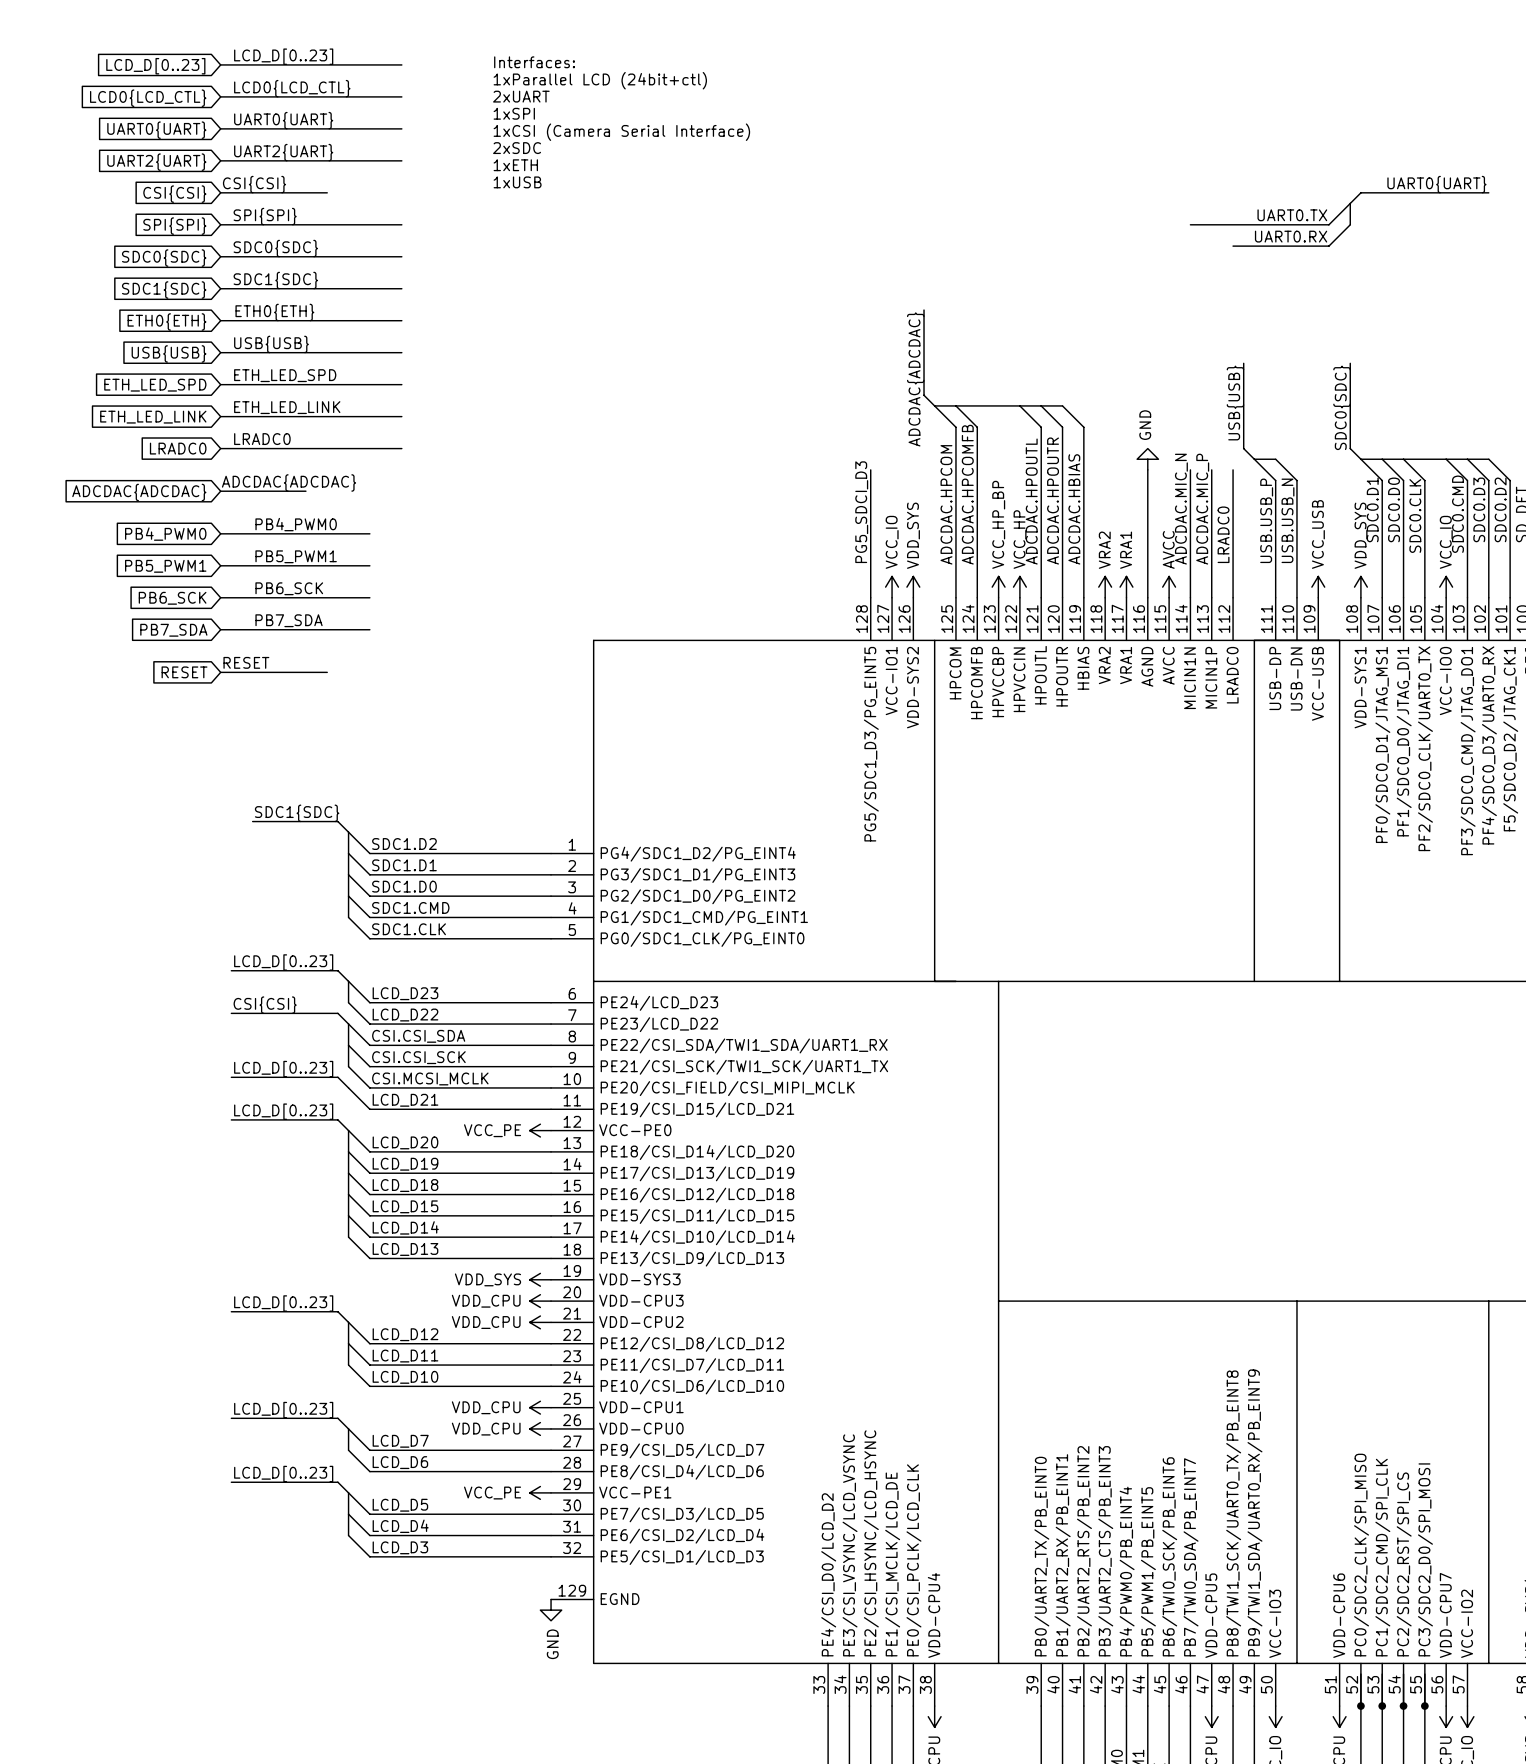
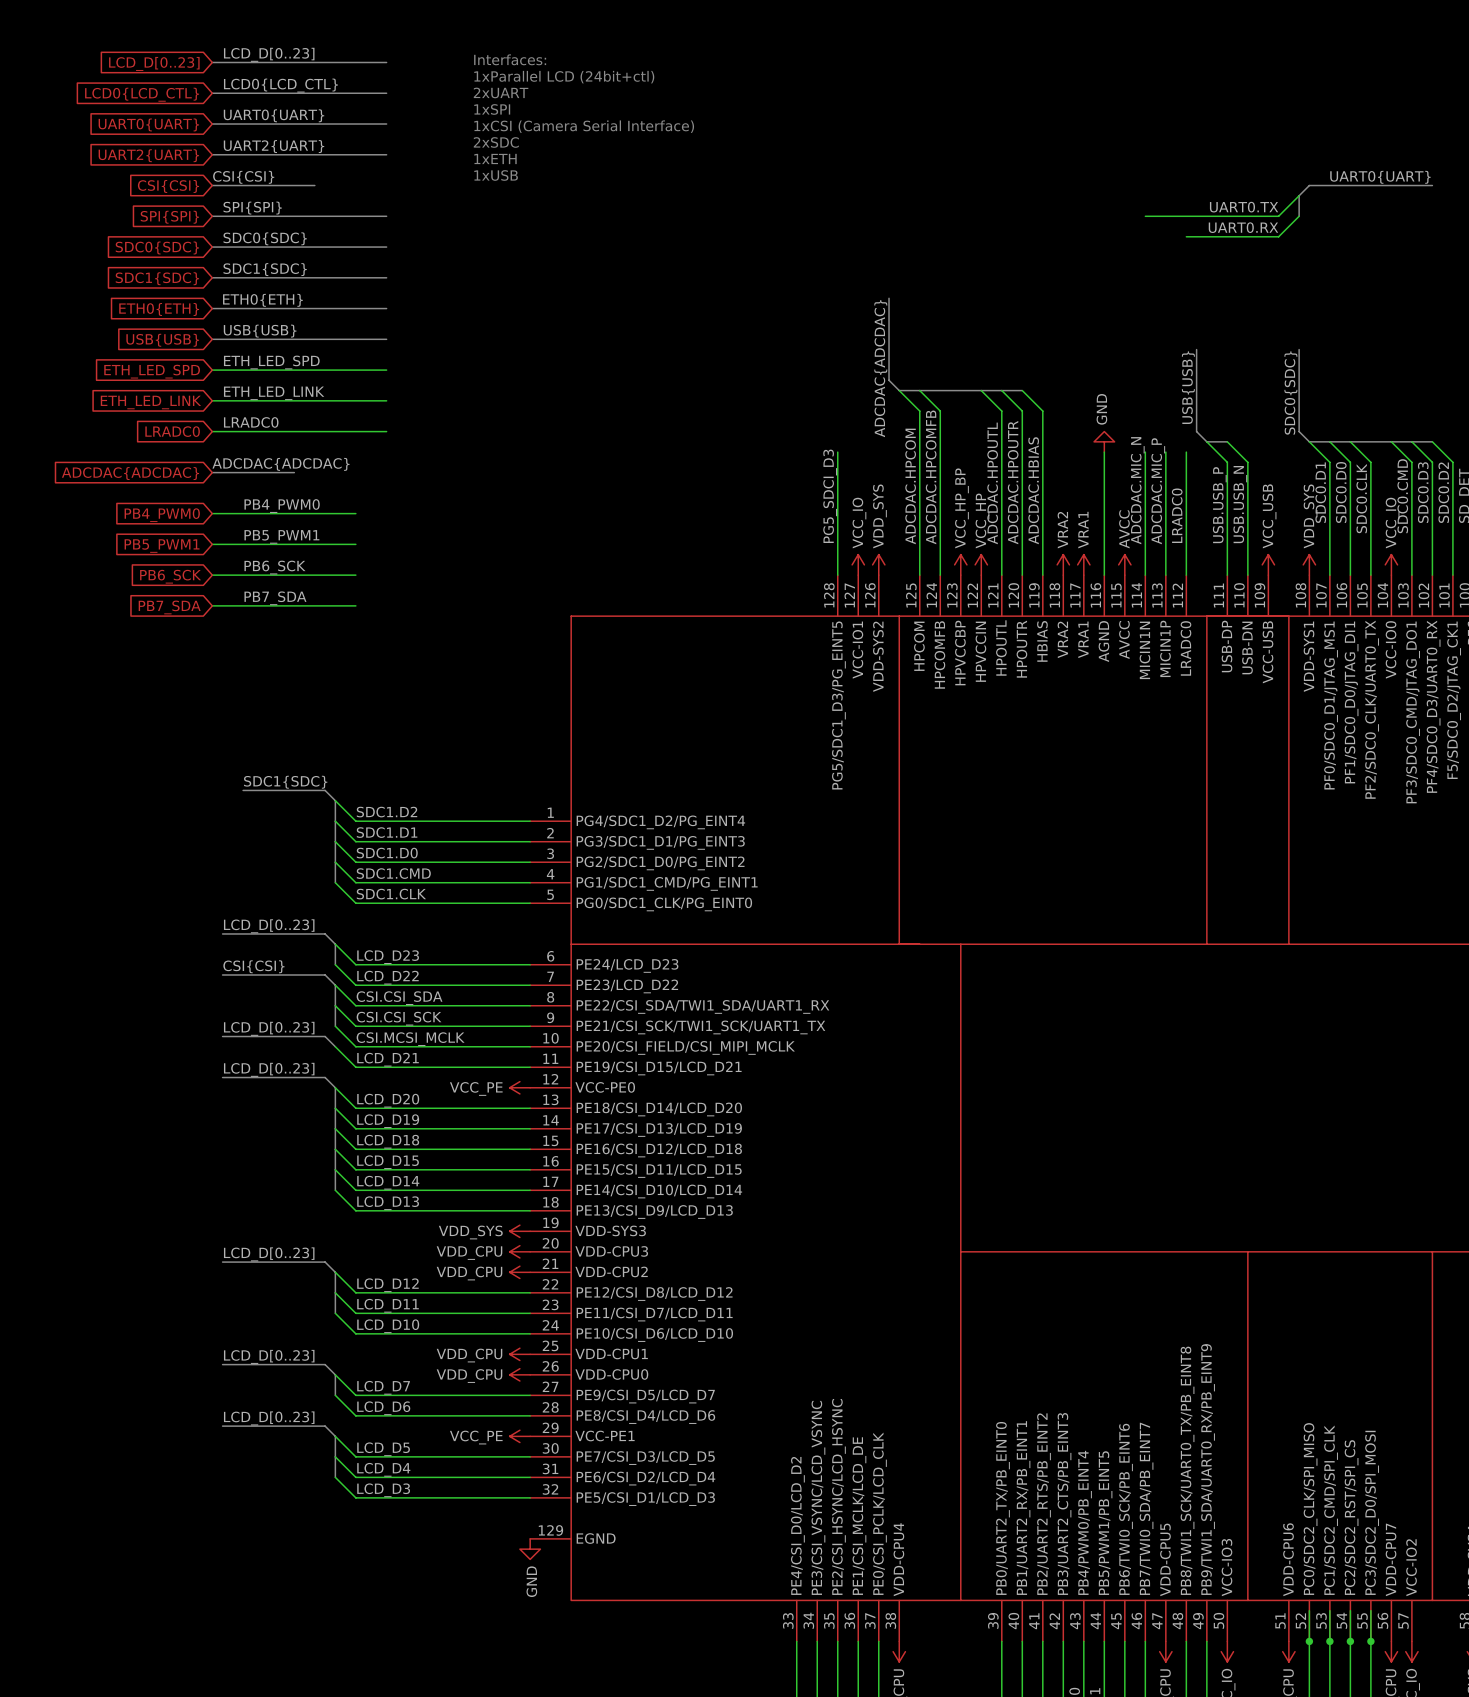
label: RESET (246, 662) -> none
global label: RESET (184, 672) -> none
wire: (220, 672) (327, 672) -> none

